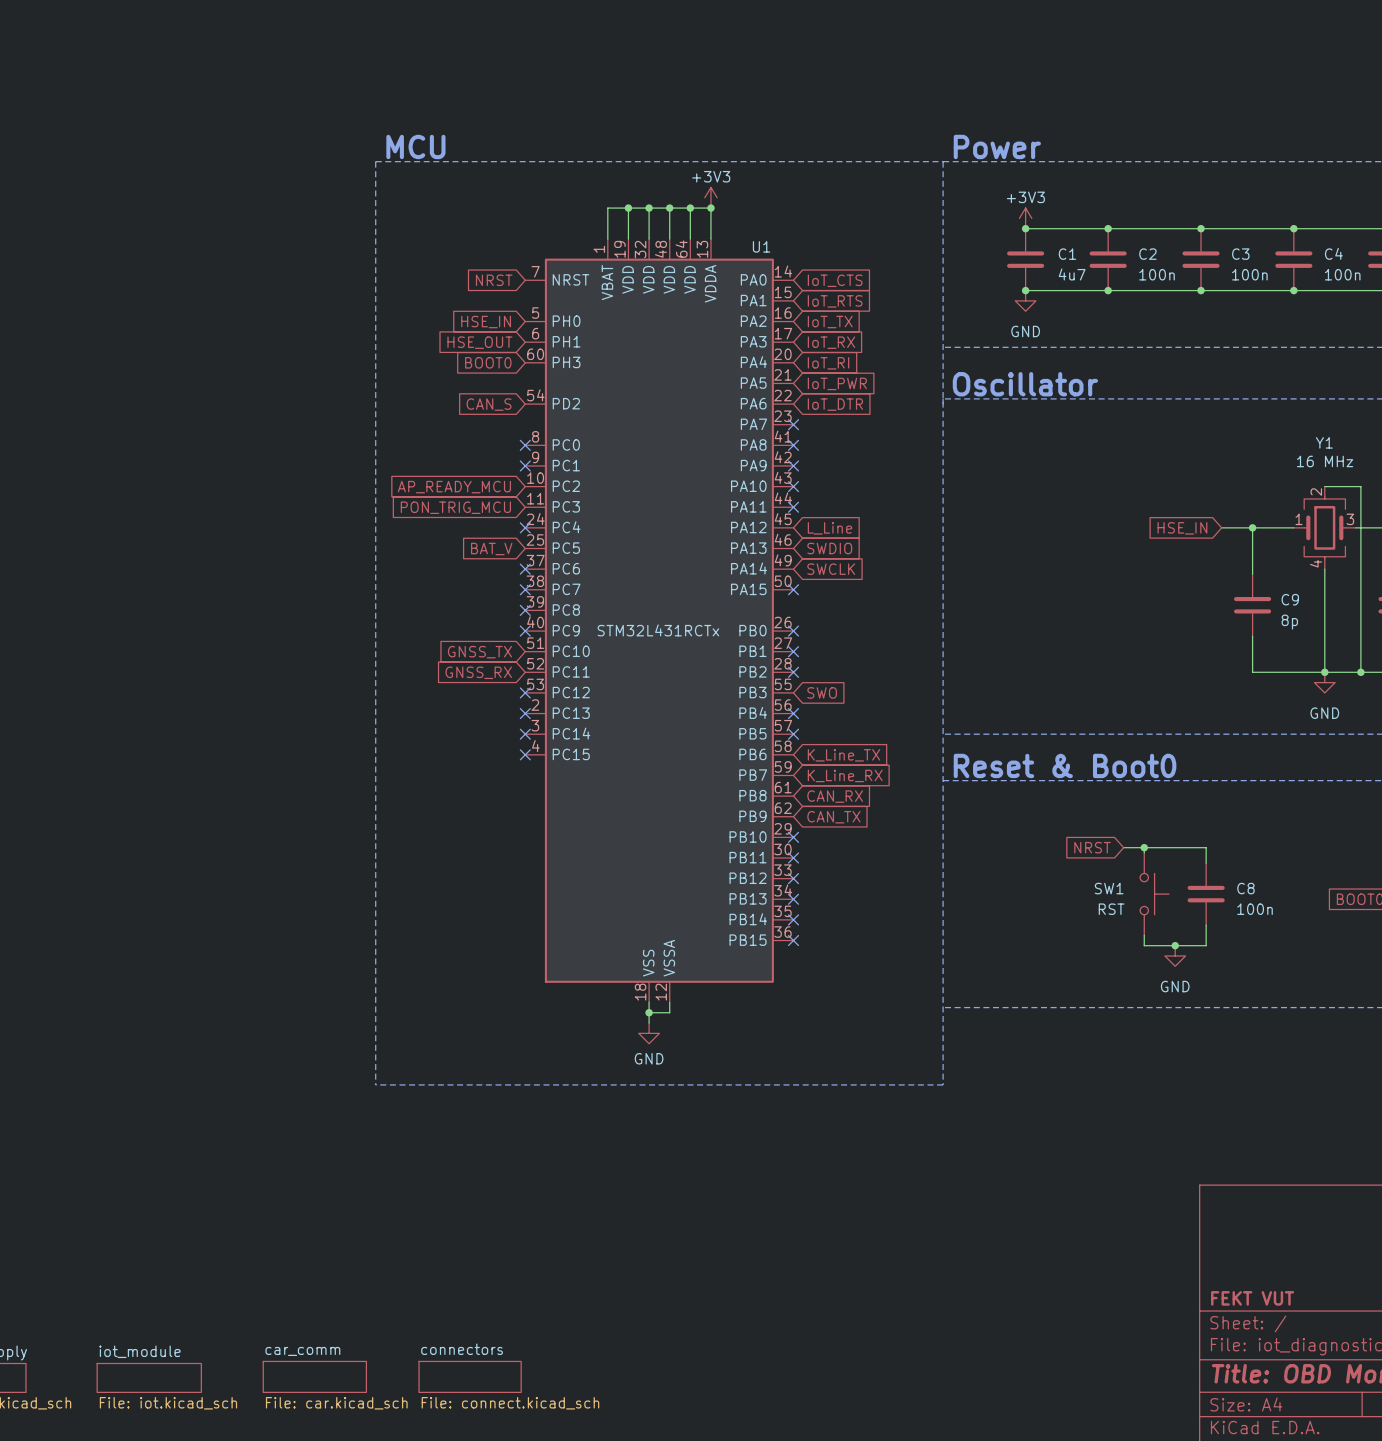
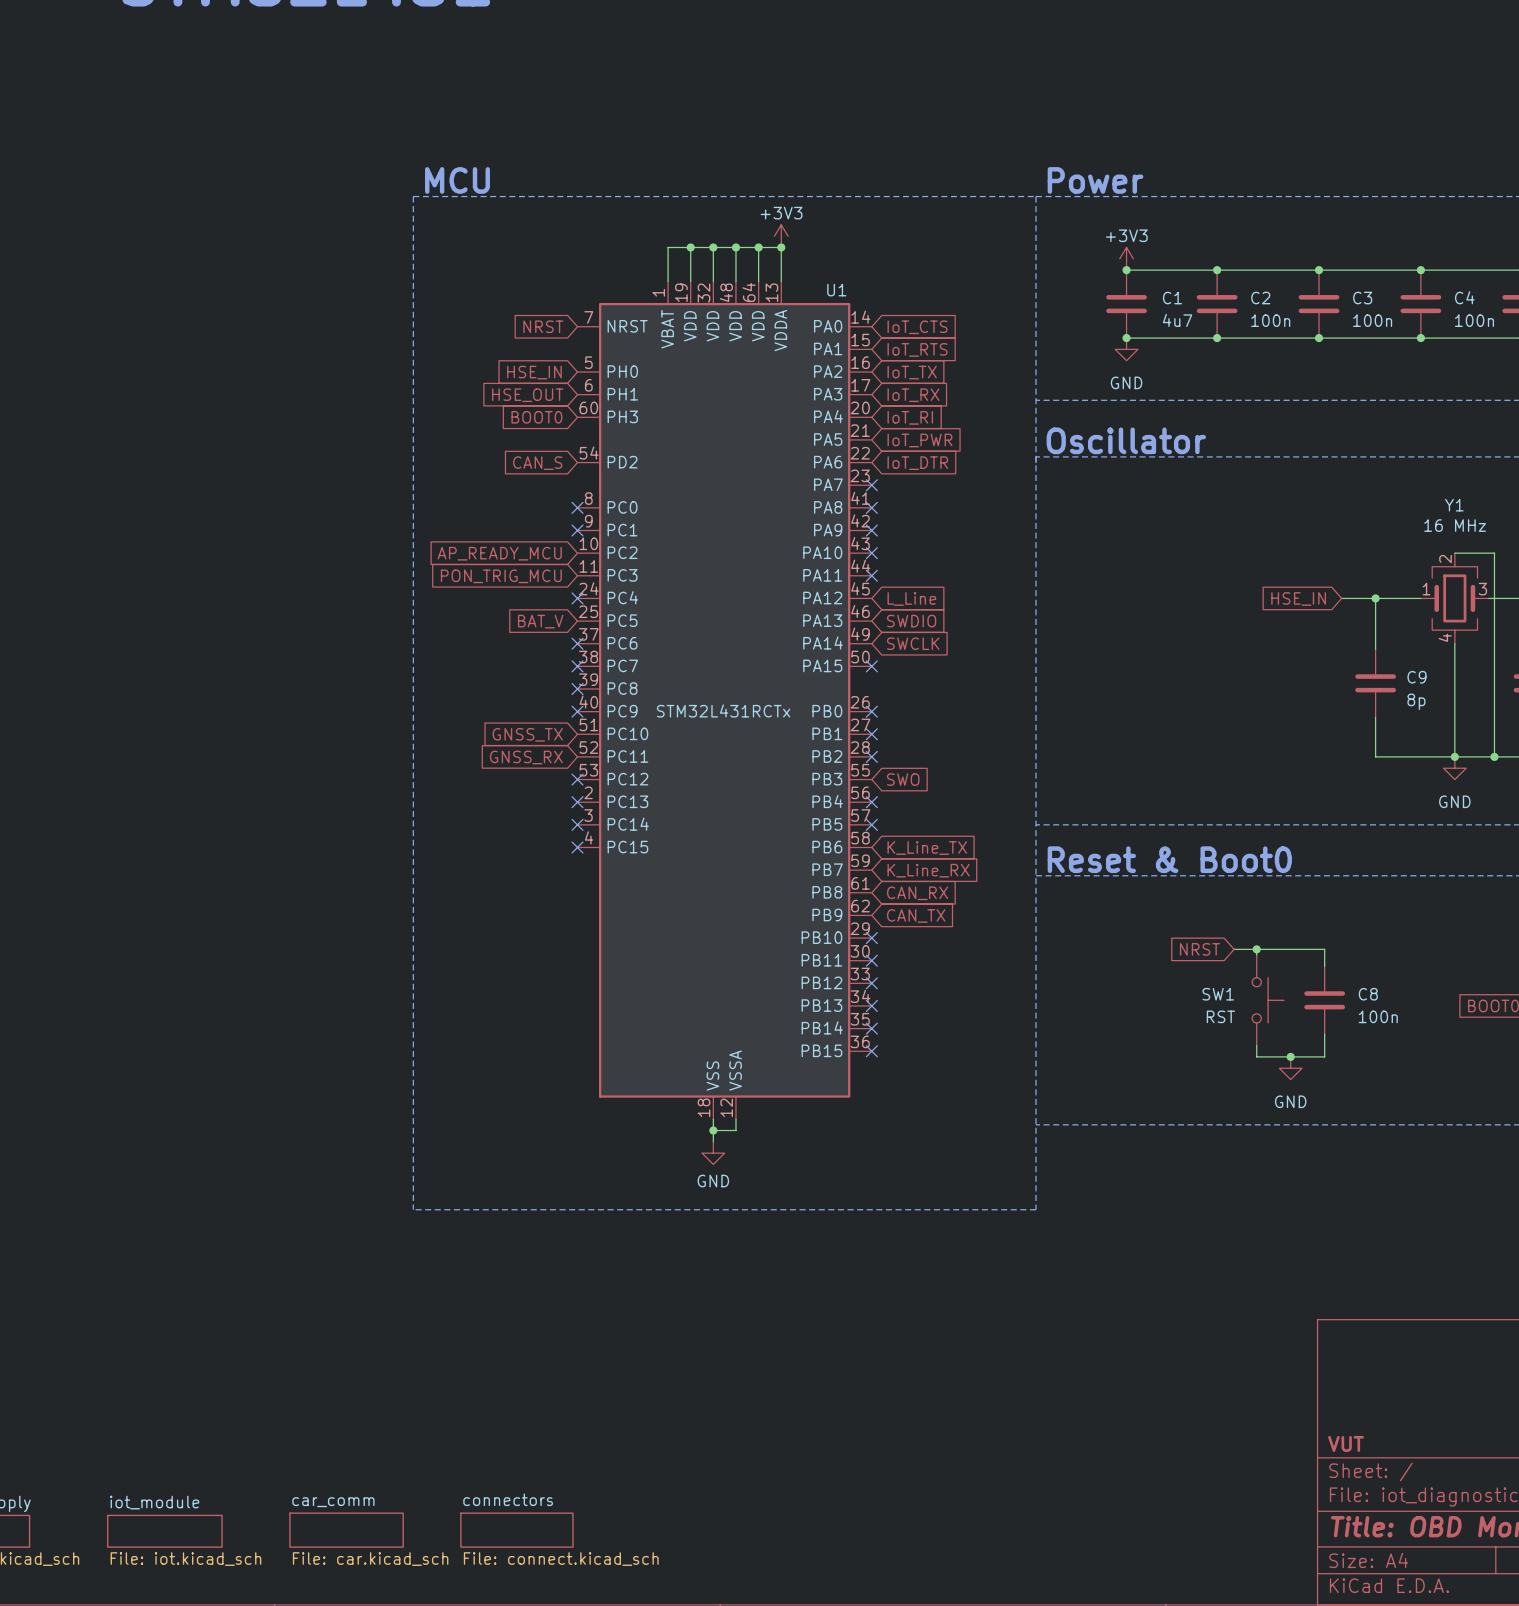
title block: FEKT VUT (1252, 1298) -> VUT (1346, 1443)

